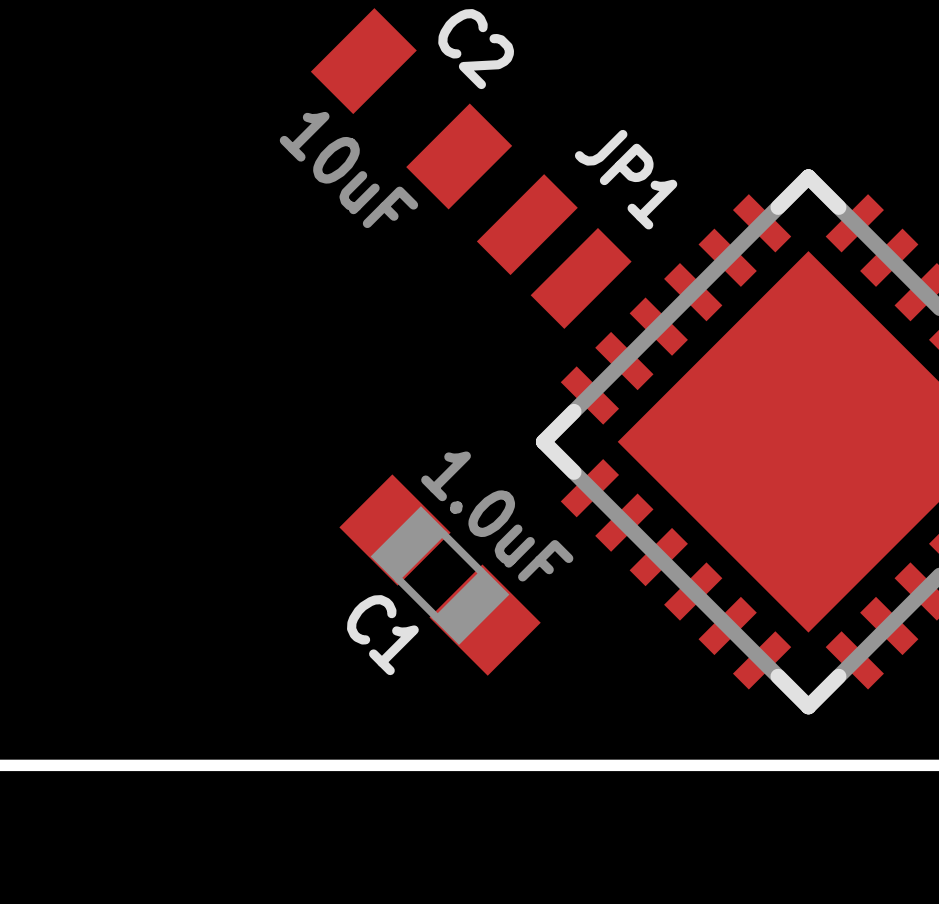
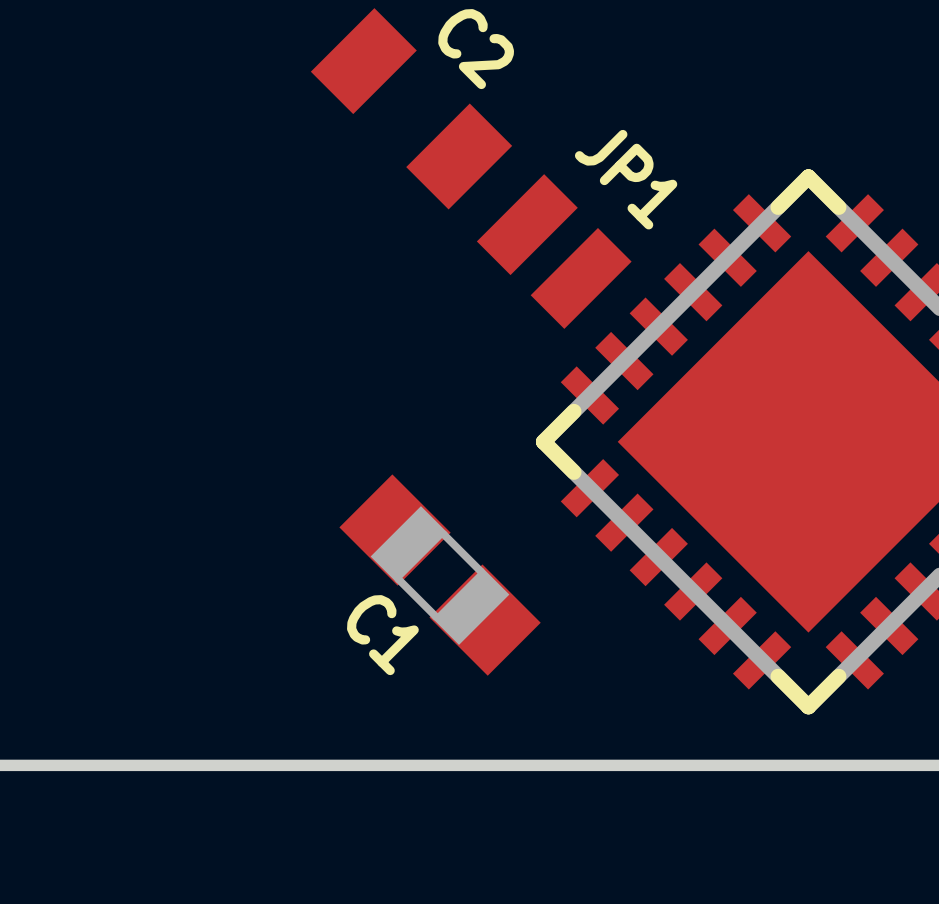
C2 value: 10uF (348, 169) -> none
C1 value: 1.0uF (497, 516) -> none

